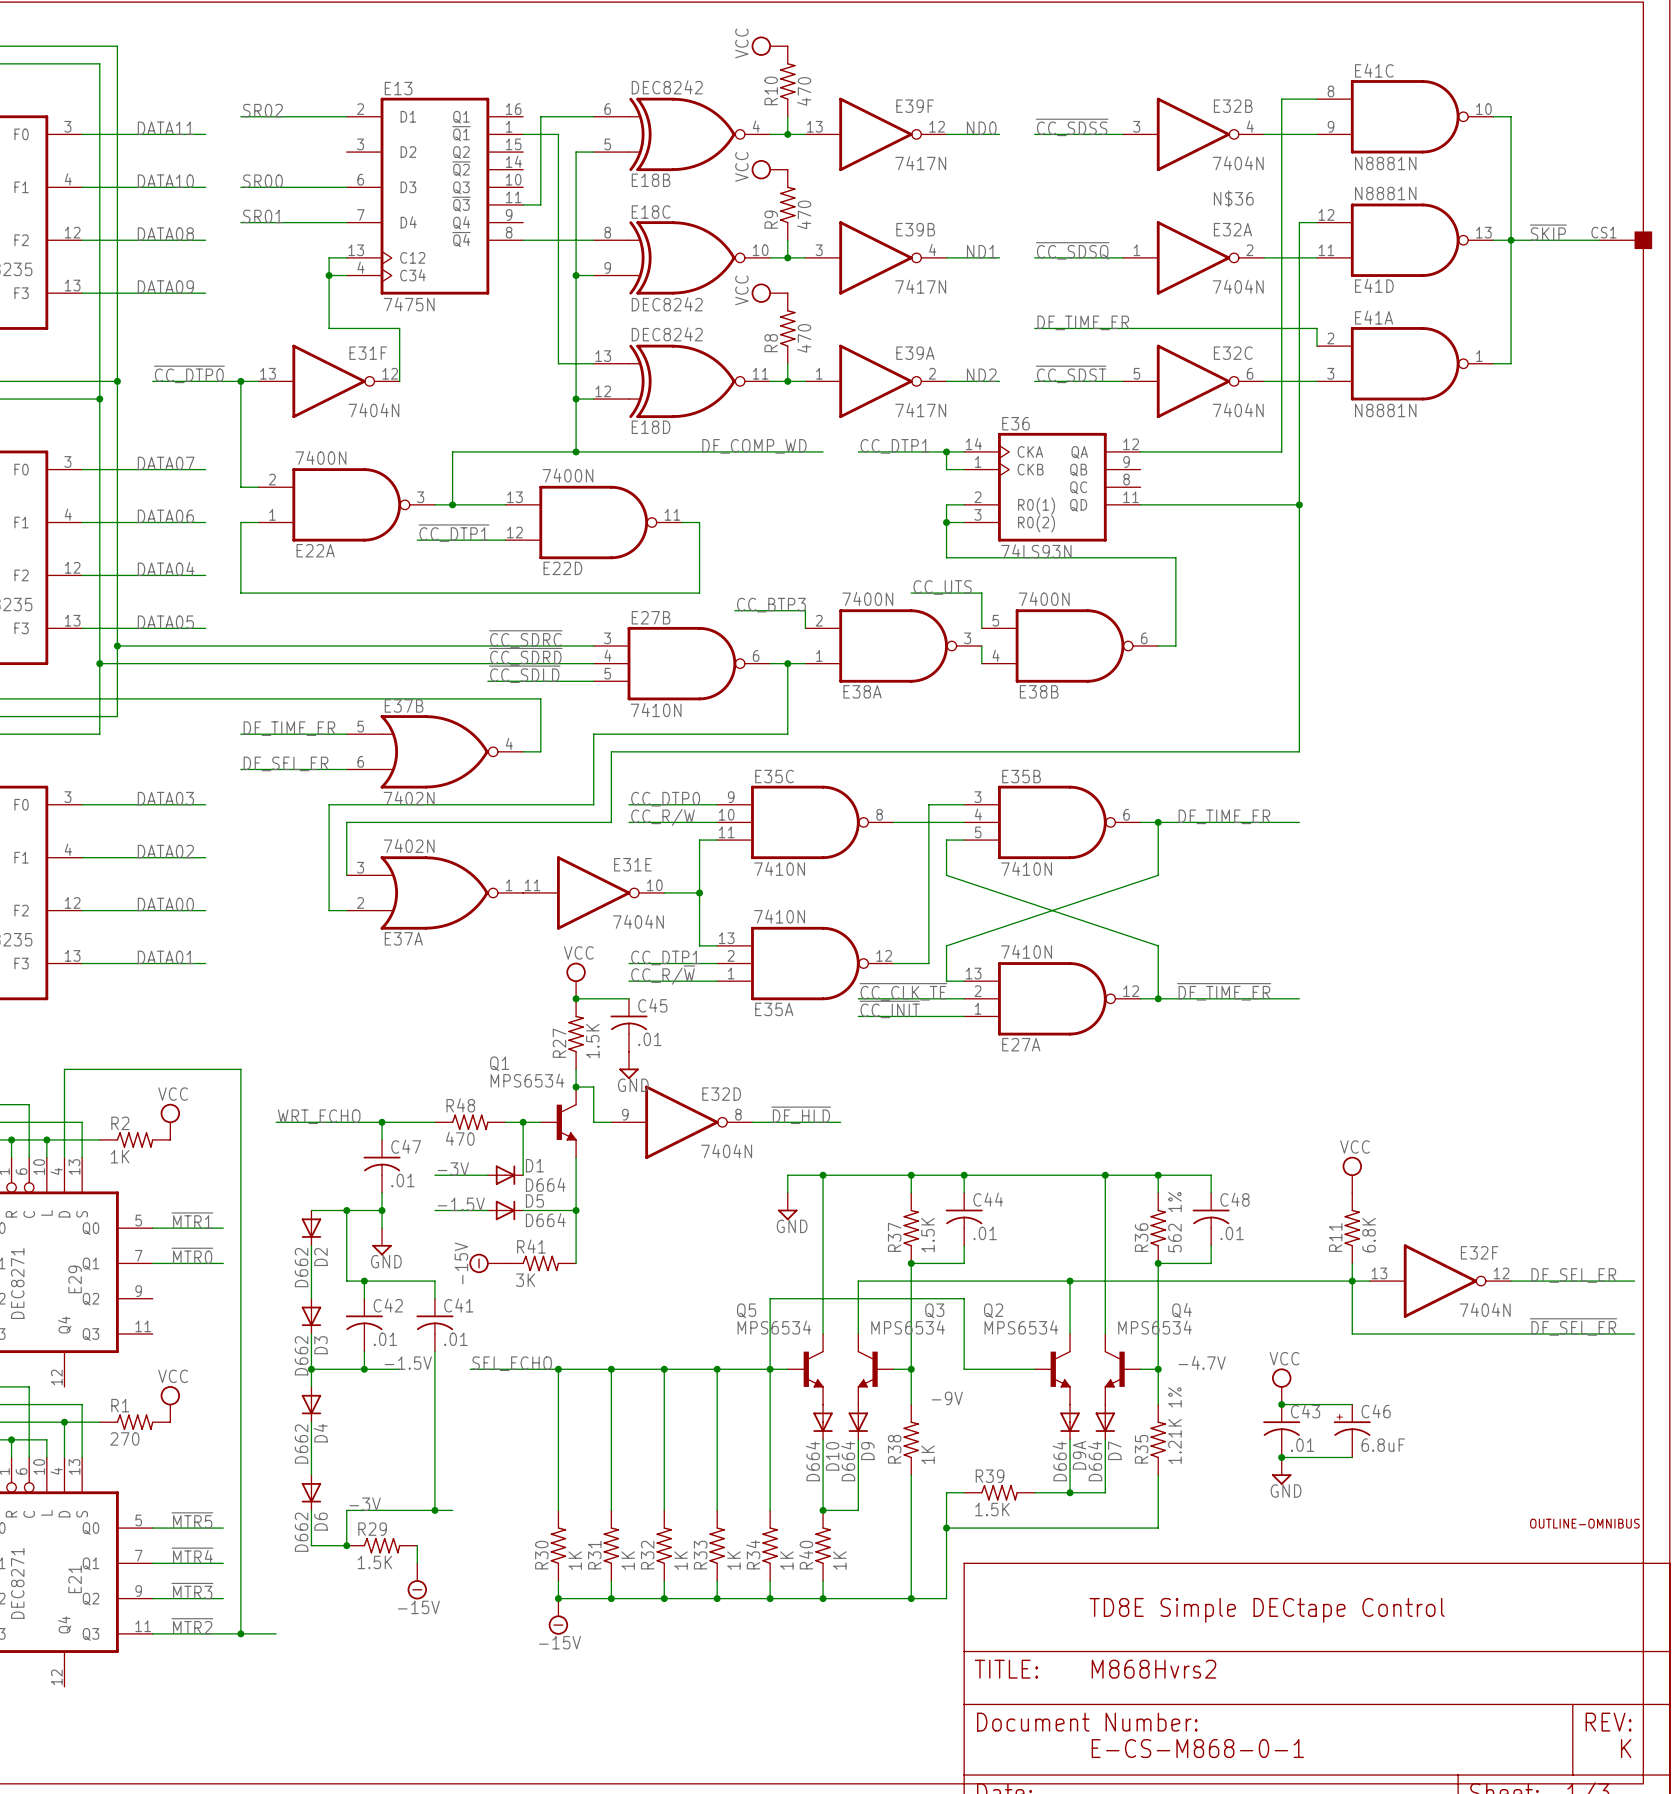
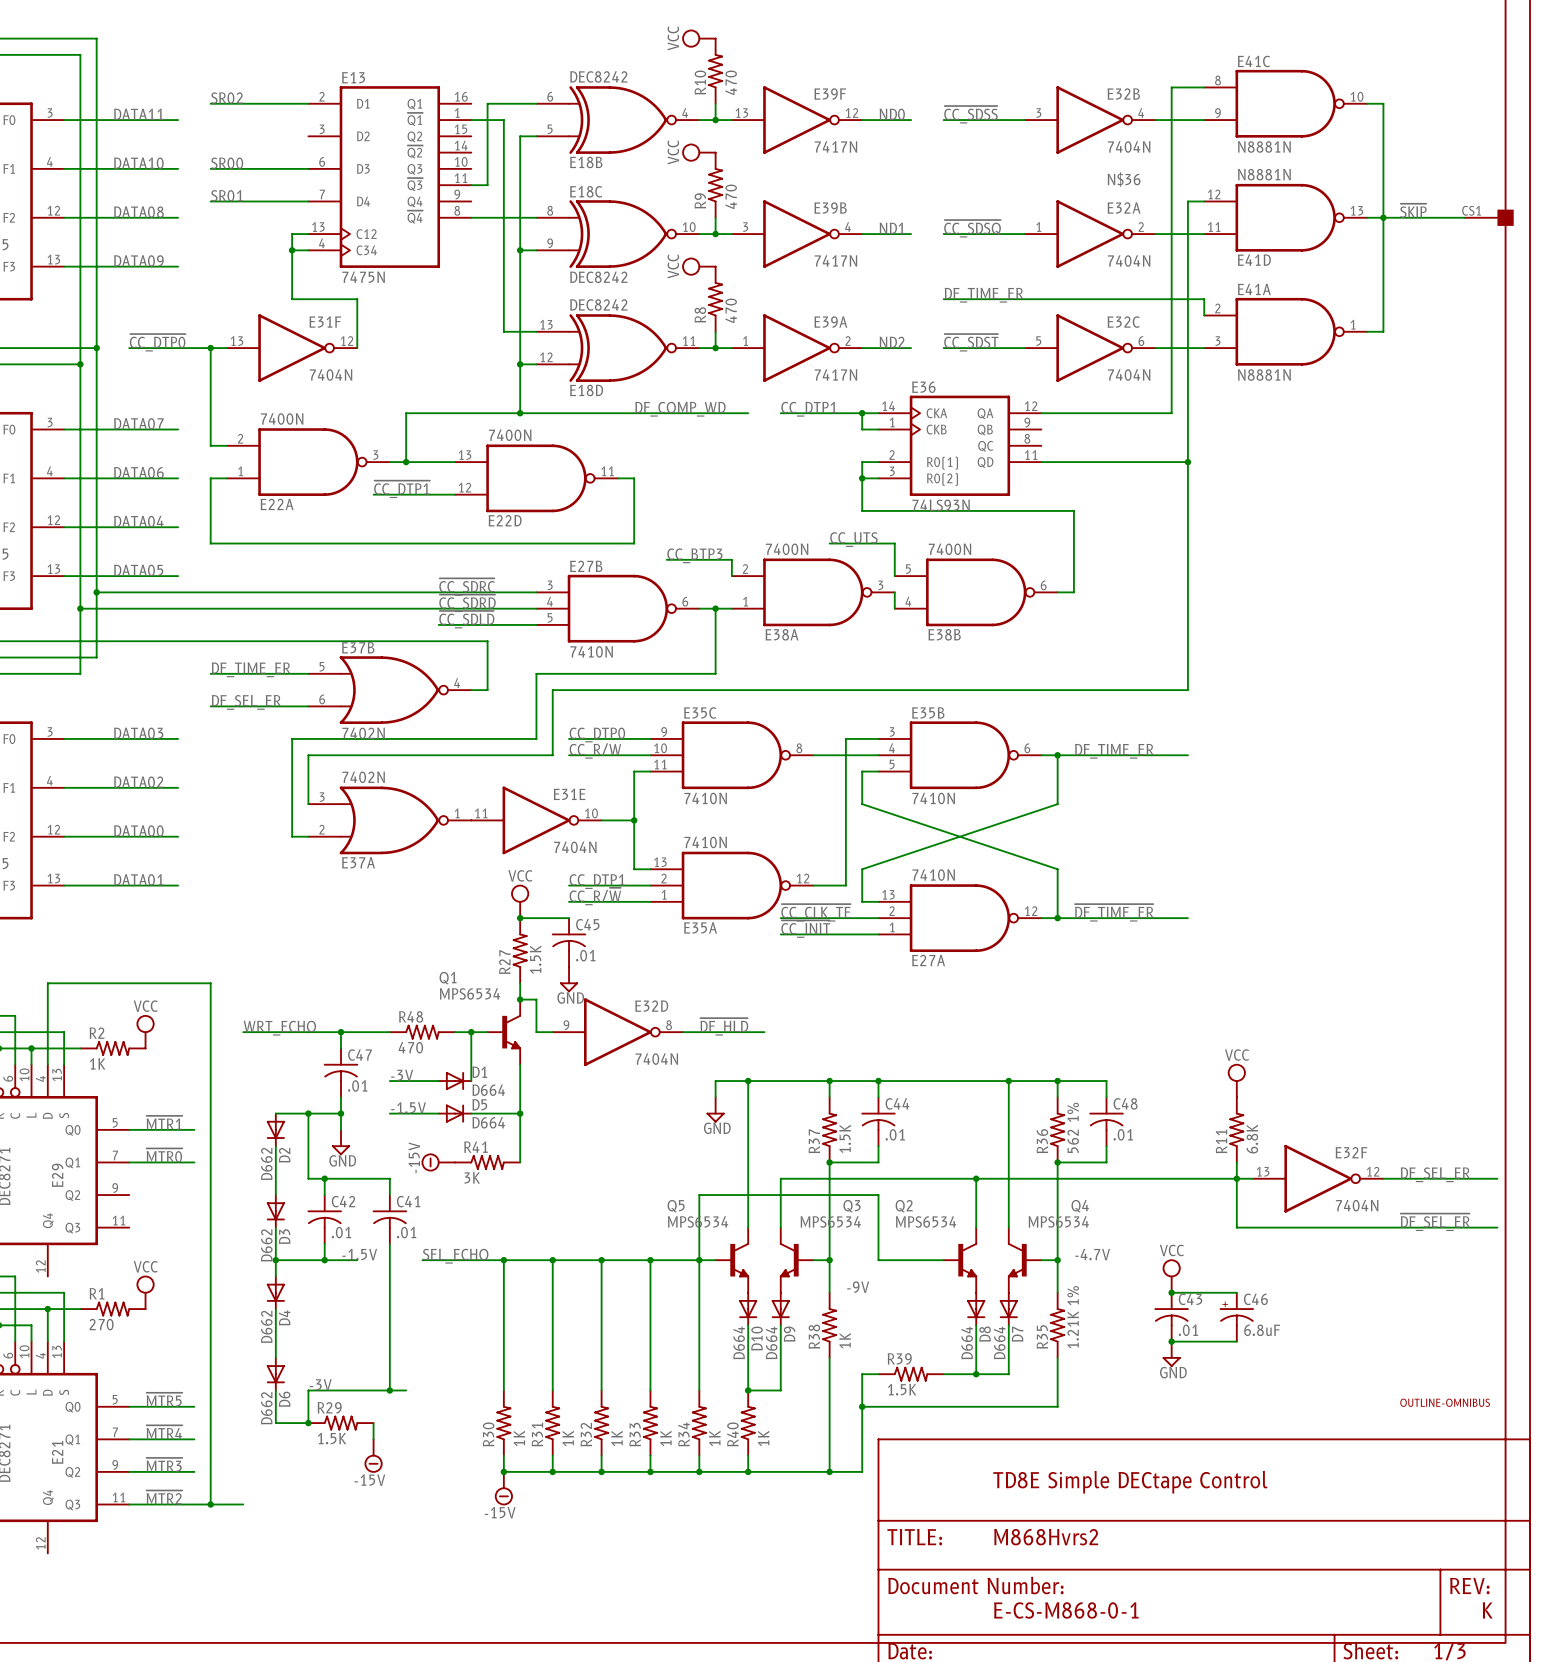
D9A name: D9A (1079, 1455) -> D8 (985, 1334)

